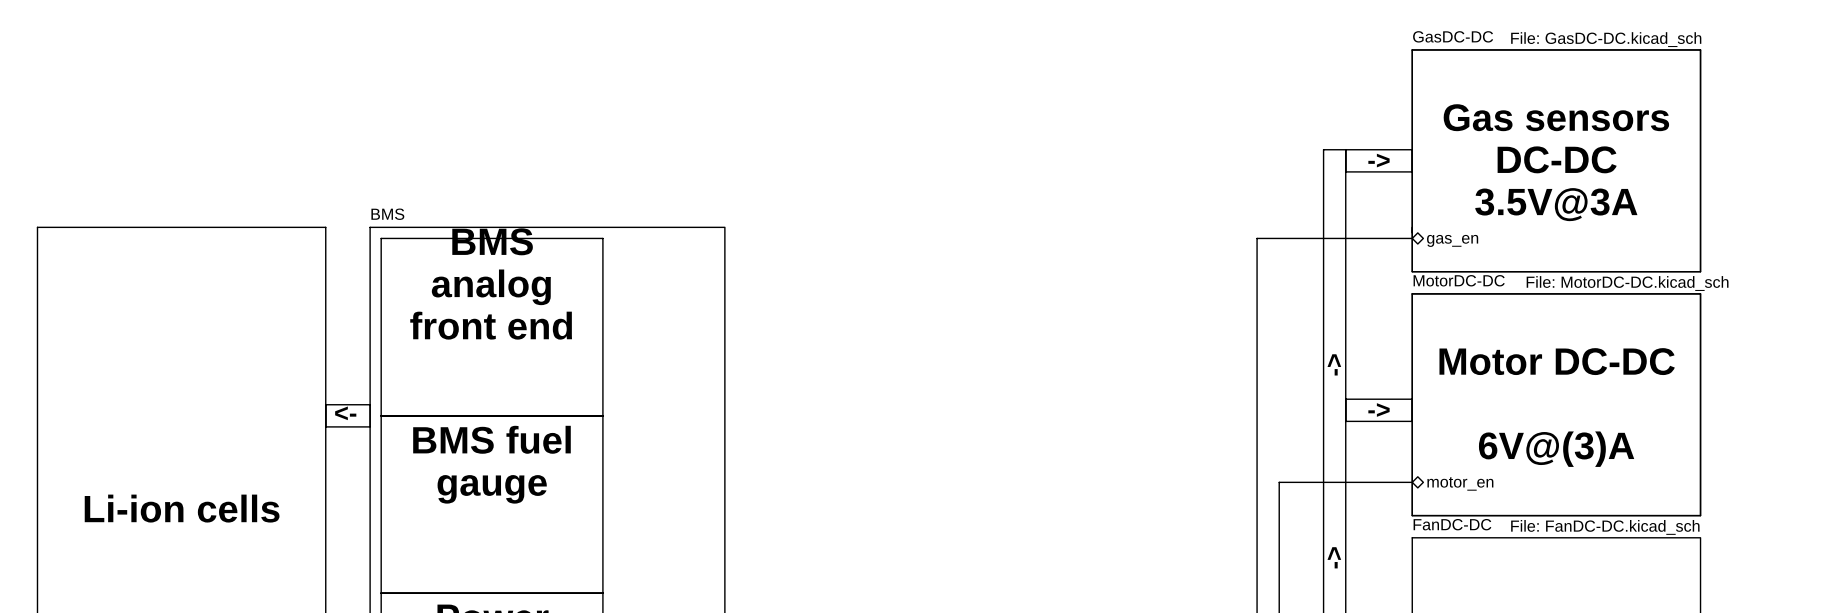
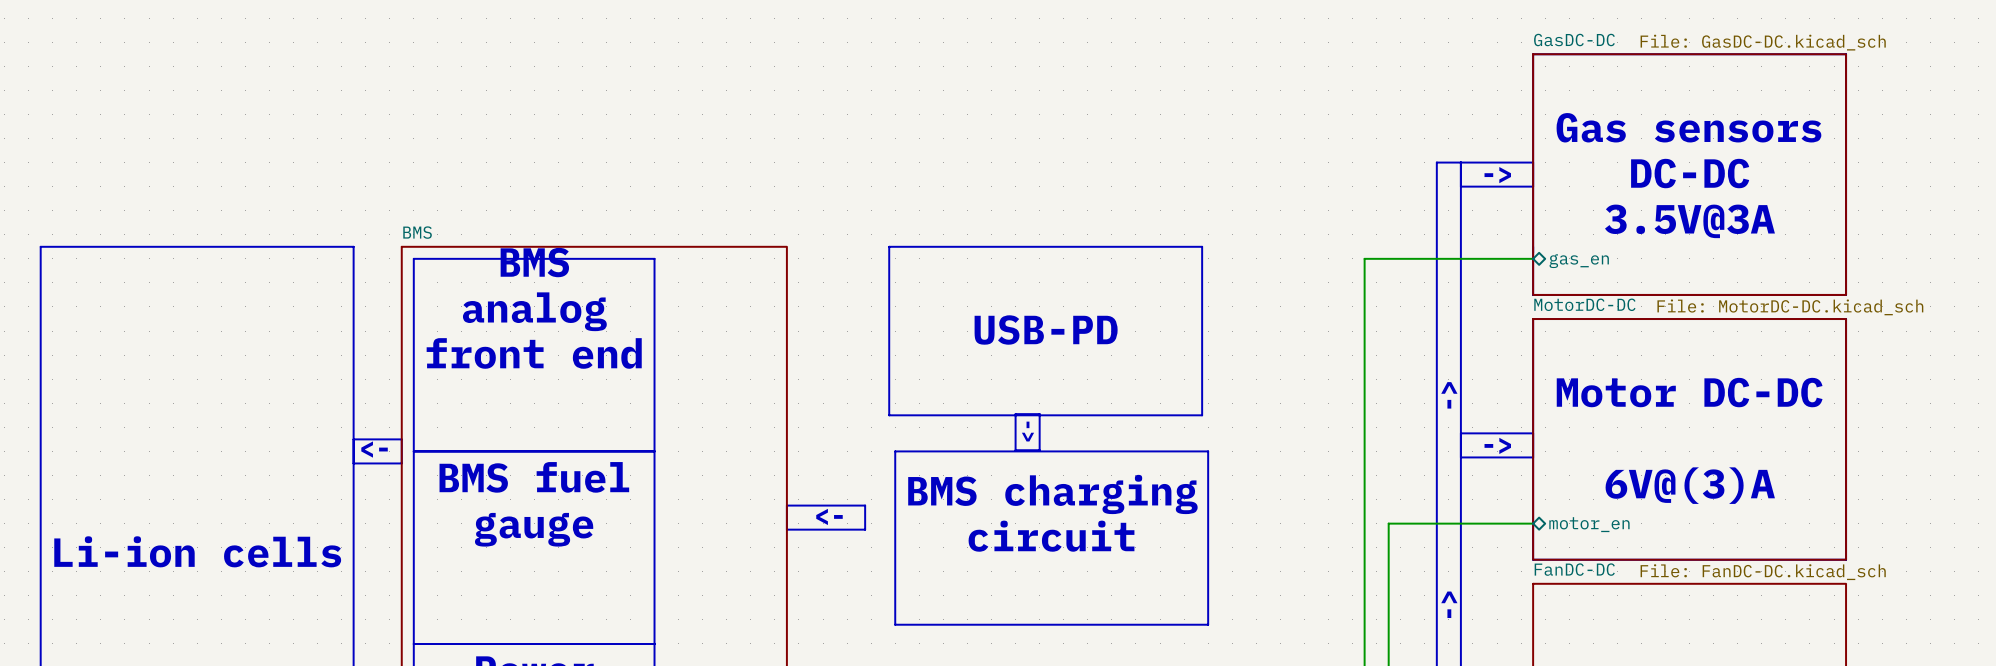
line: none -> (889, 246) (1202, 246) (1202, 415) (889, 415) (889, 246)
text: none -> USB-PD (1046, 330)
line: none -> (1015, 414) (1039, 414) (1039, 450) (1015, 450) (1015, 414)
text: none -> <- (1027, 431)
line: none -> (895, 451) (1208, 451) (1208, 624) (895, 624) (895, 451)
text: none -> BMS charging (1052, 494)
line: none -> (786, 505) (865, 505) (865, 529) (786, 529) (786, 505)
text: none -> <- (829, 516)
text: none -> circuit (1051, 536)

